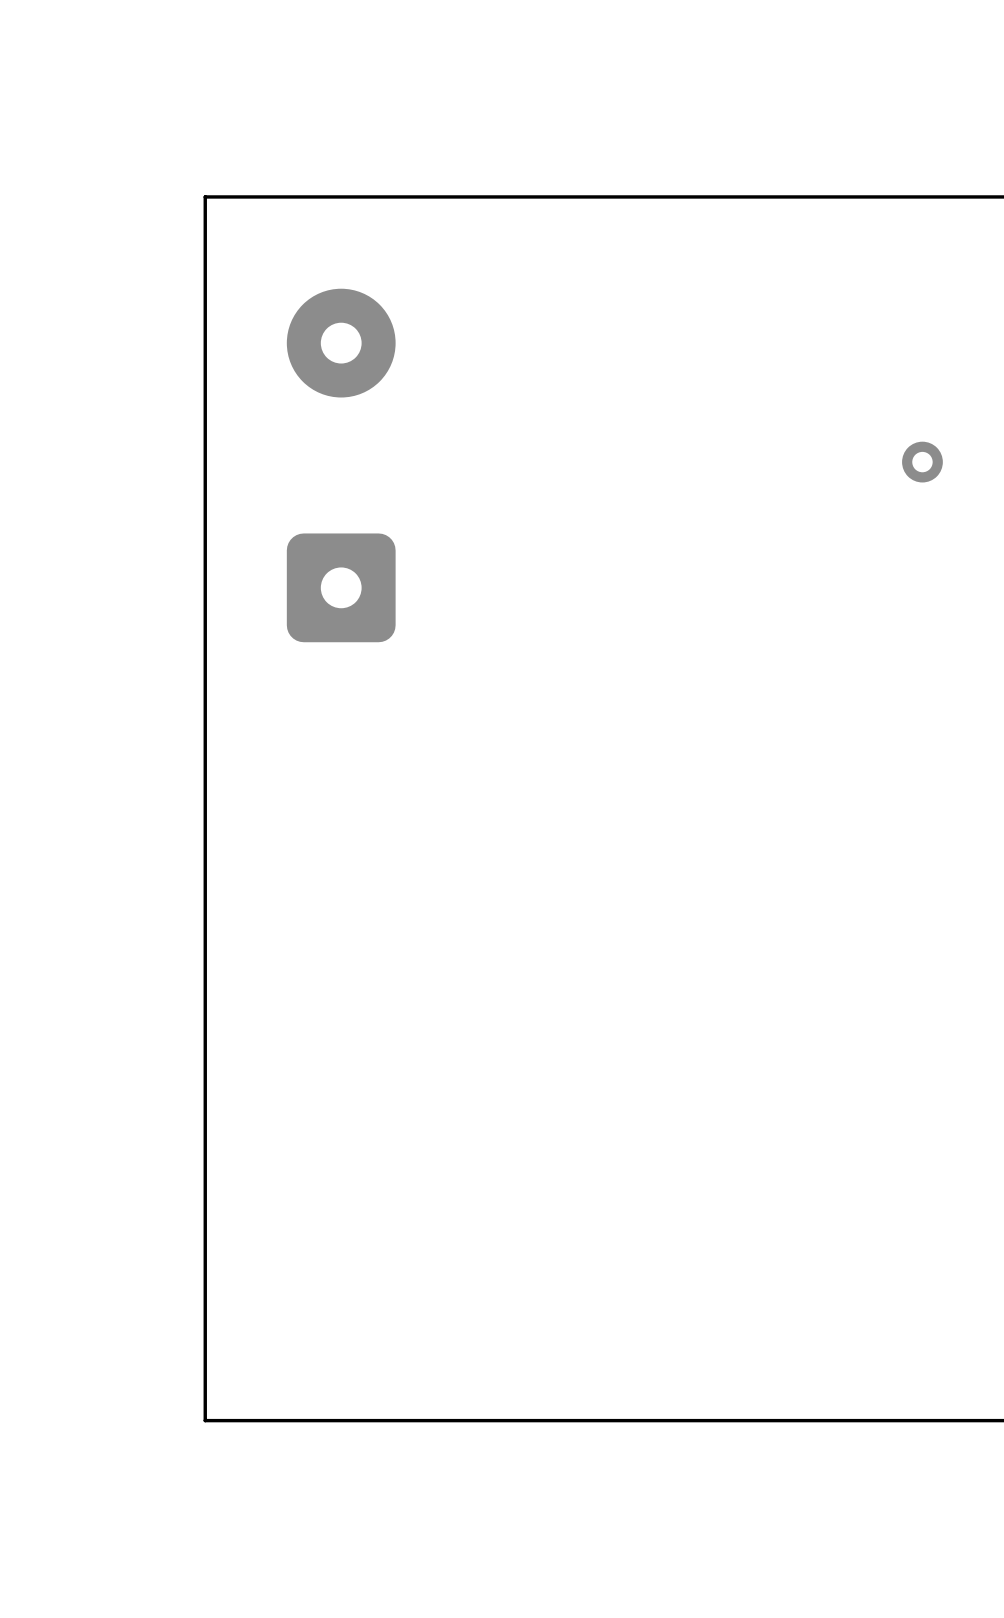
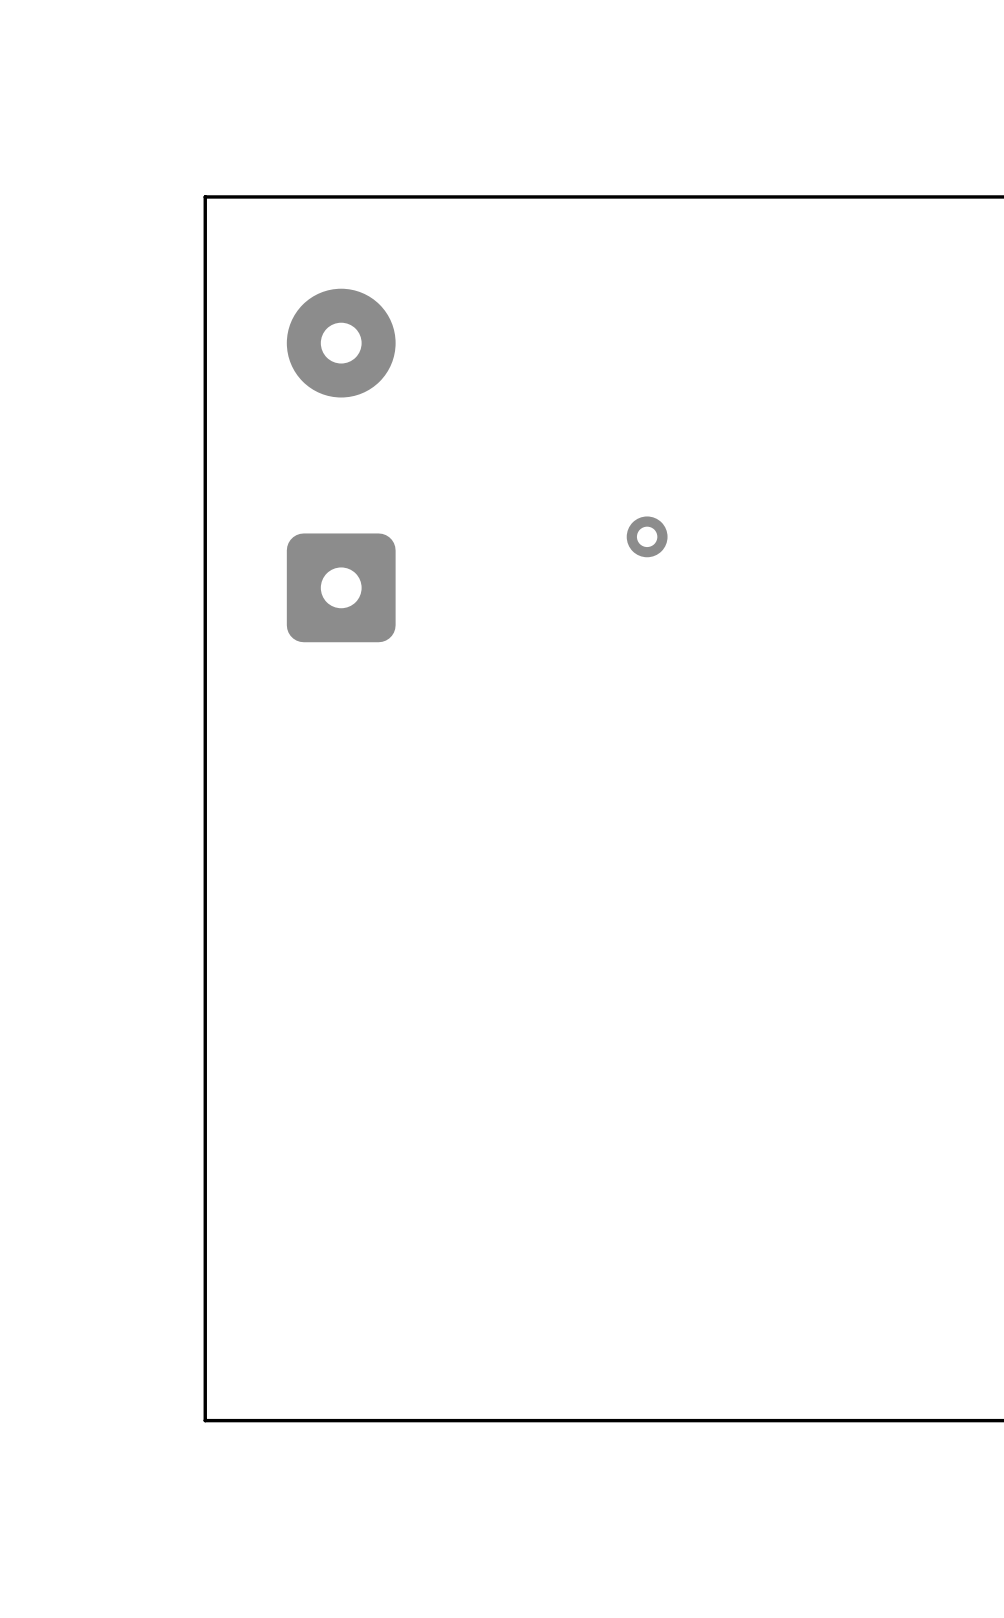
via: (922, 462) -> none
via: none -> (647, 536)

